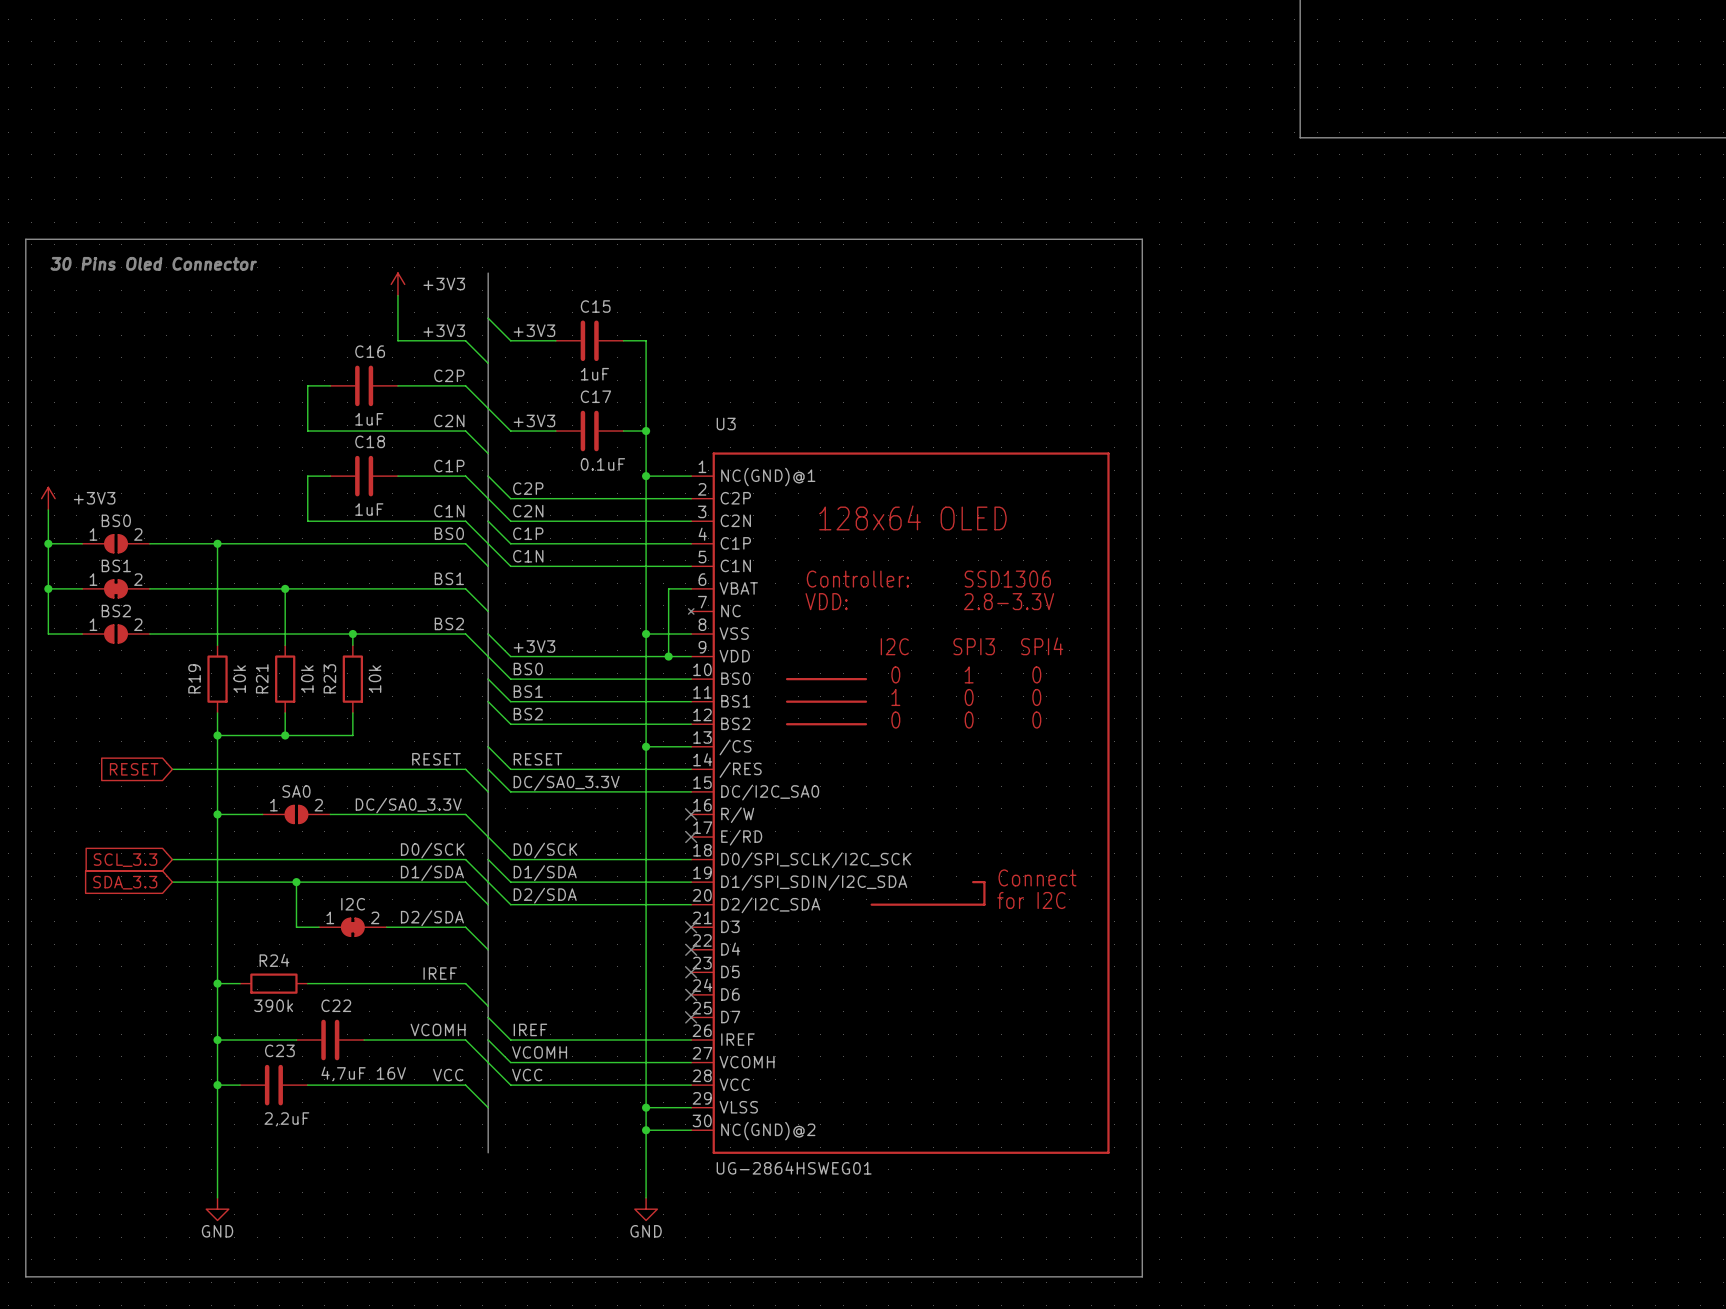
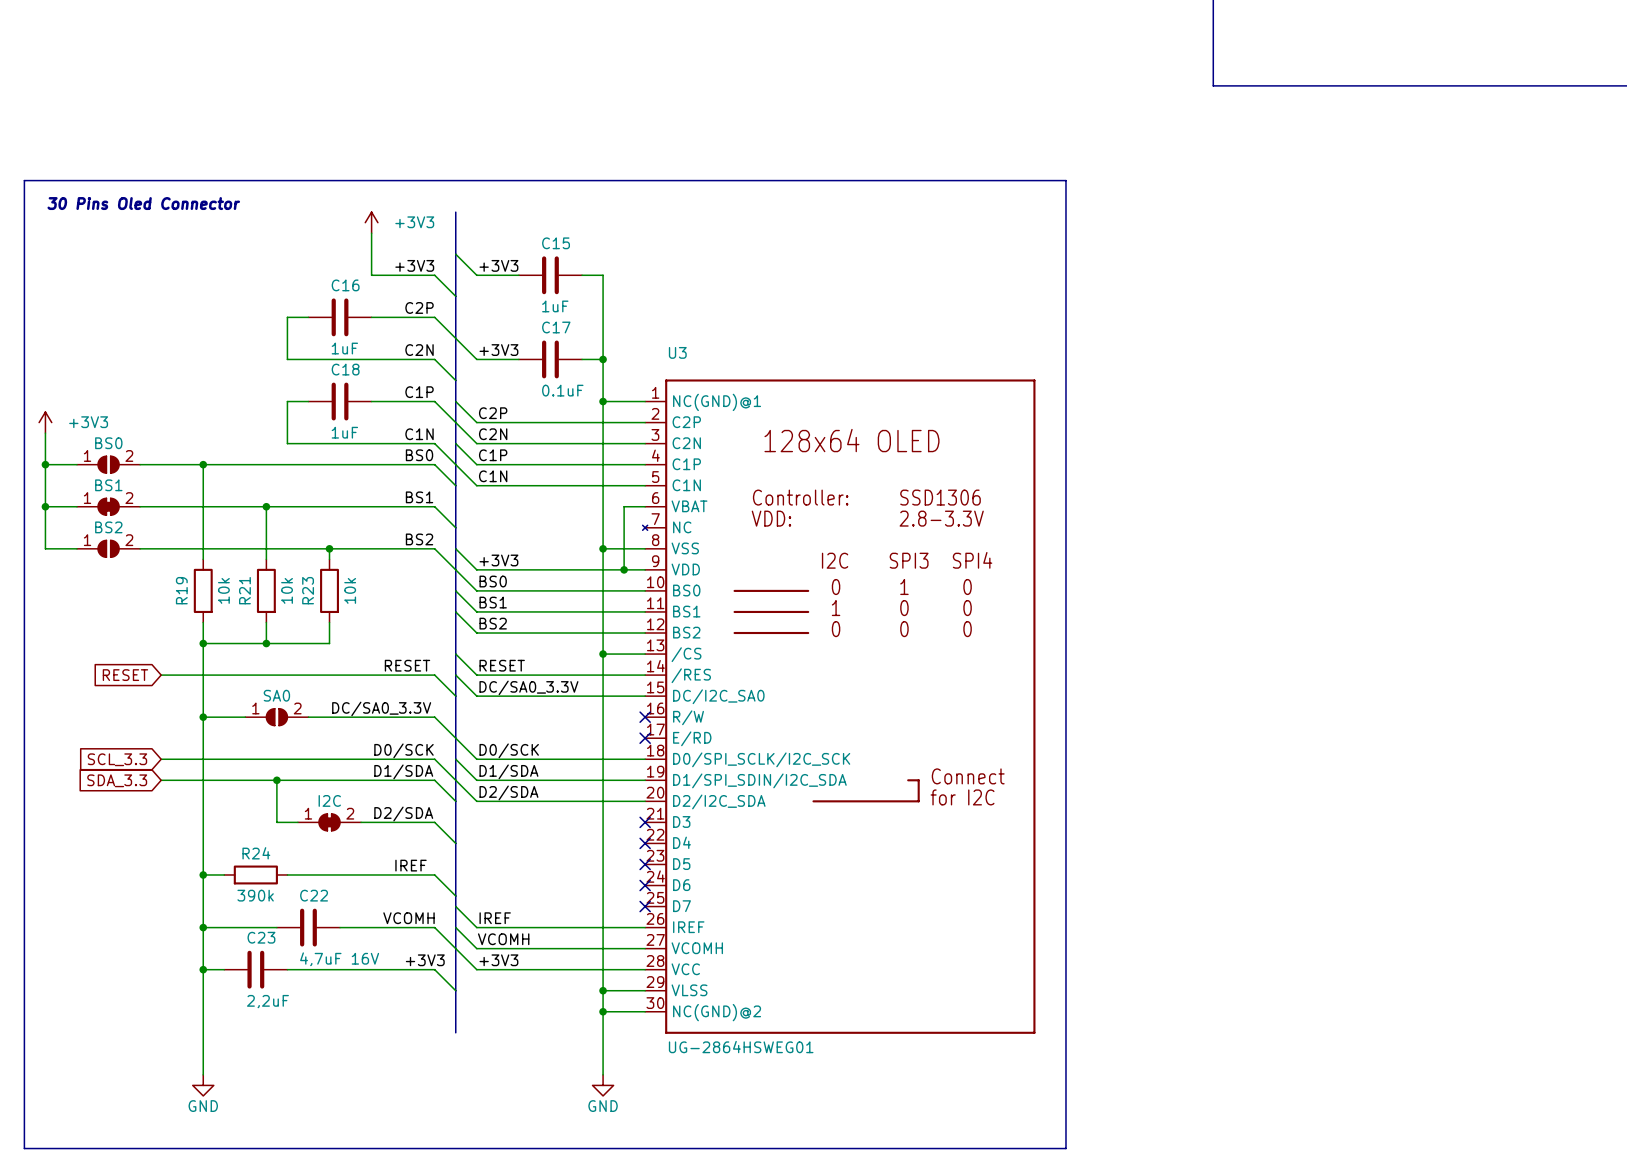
label: VCC (448, 1075) -> +3V3 (425, 960)
label: VCC (527, 1075) -> +3V3 (498, 960)

